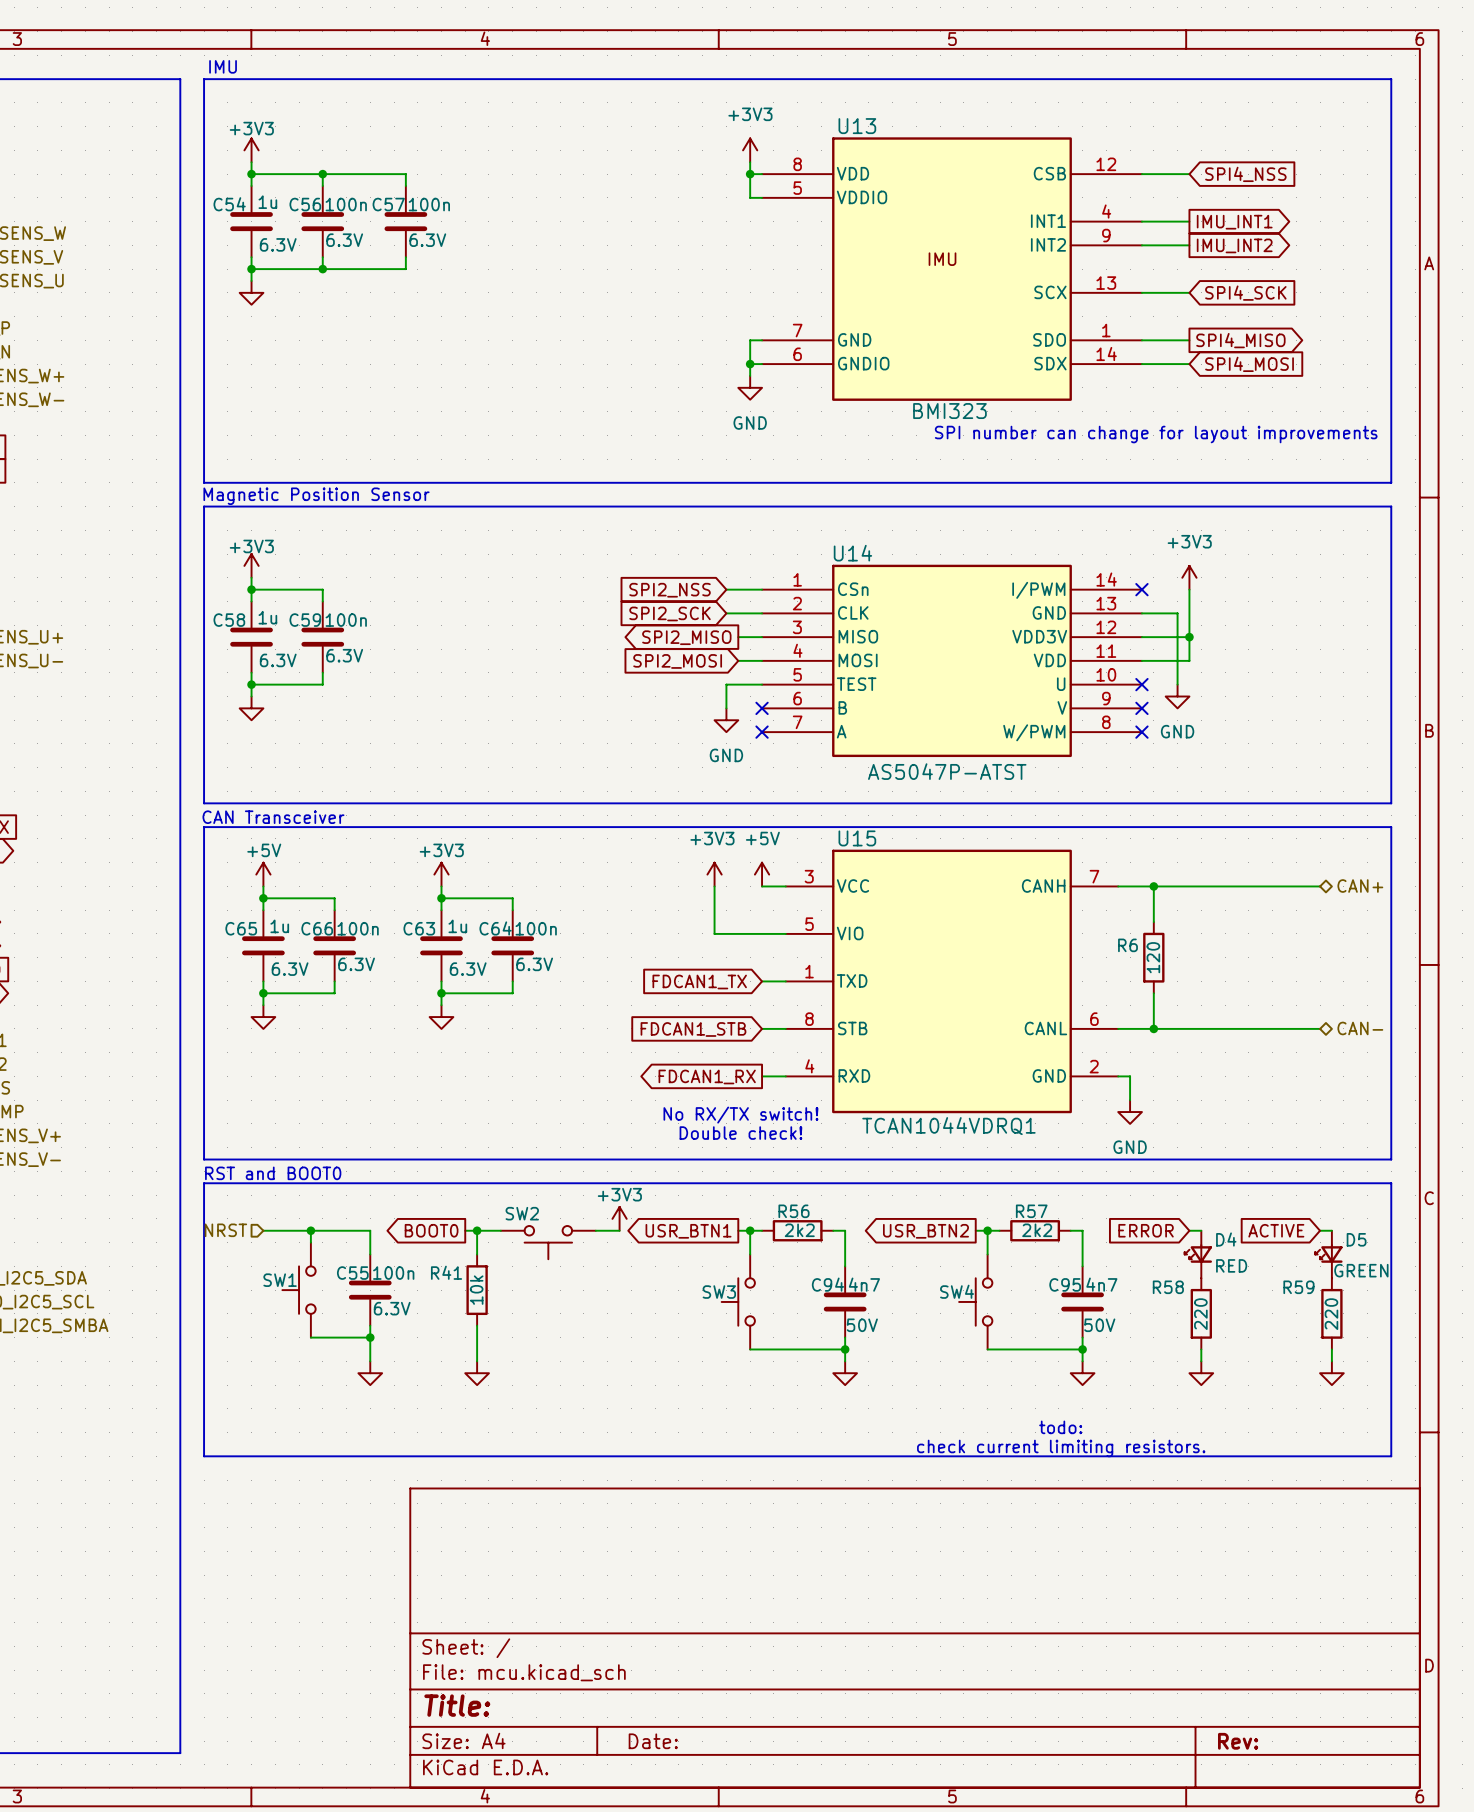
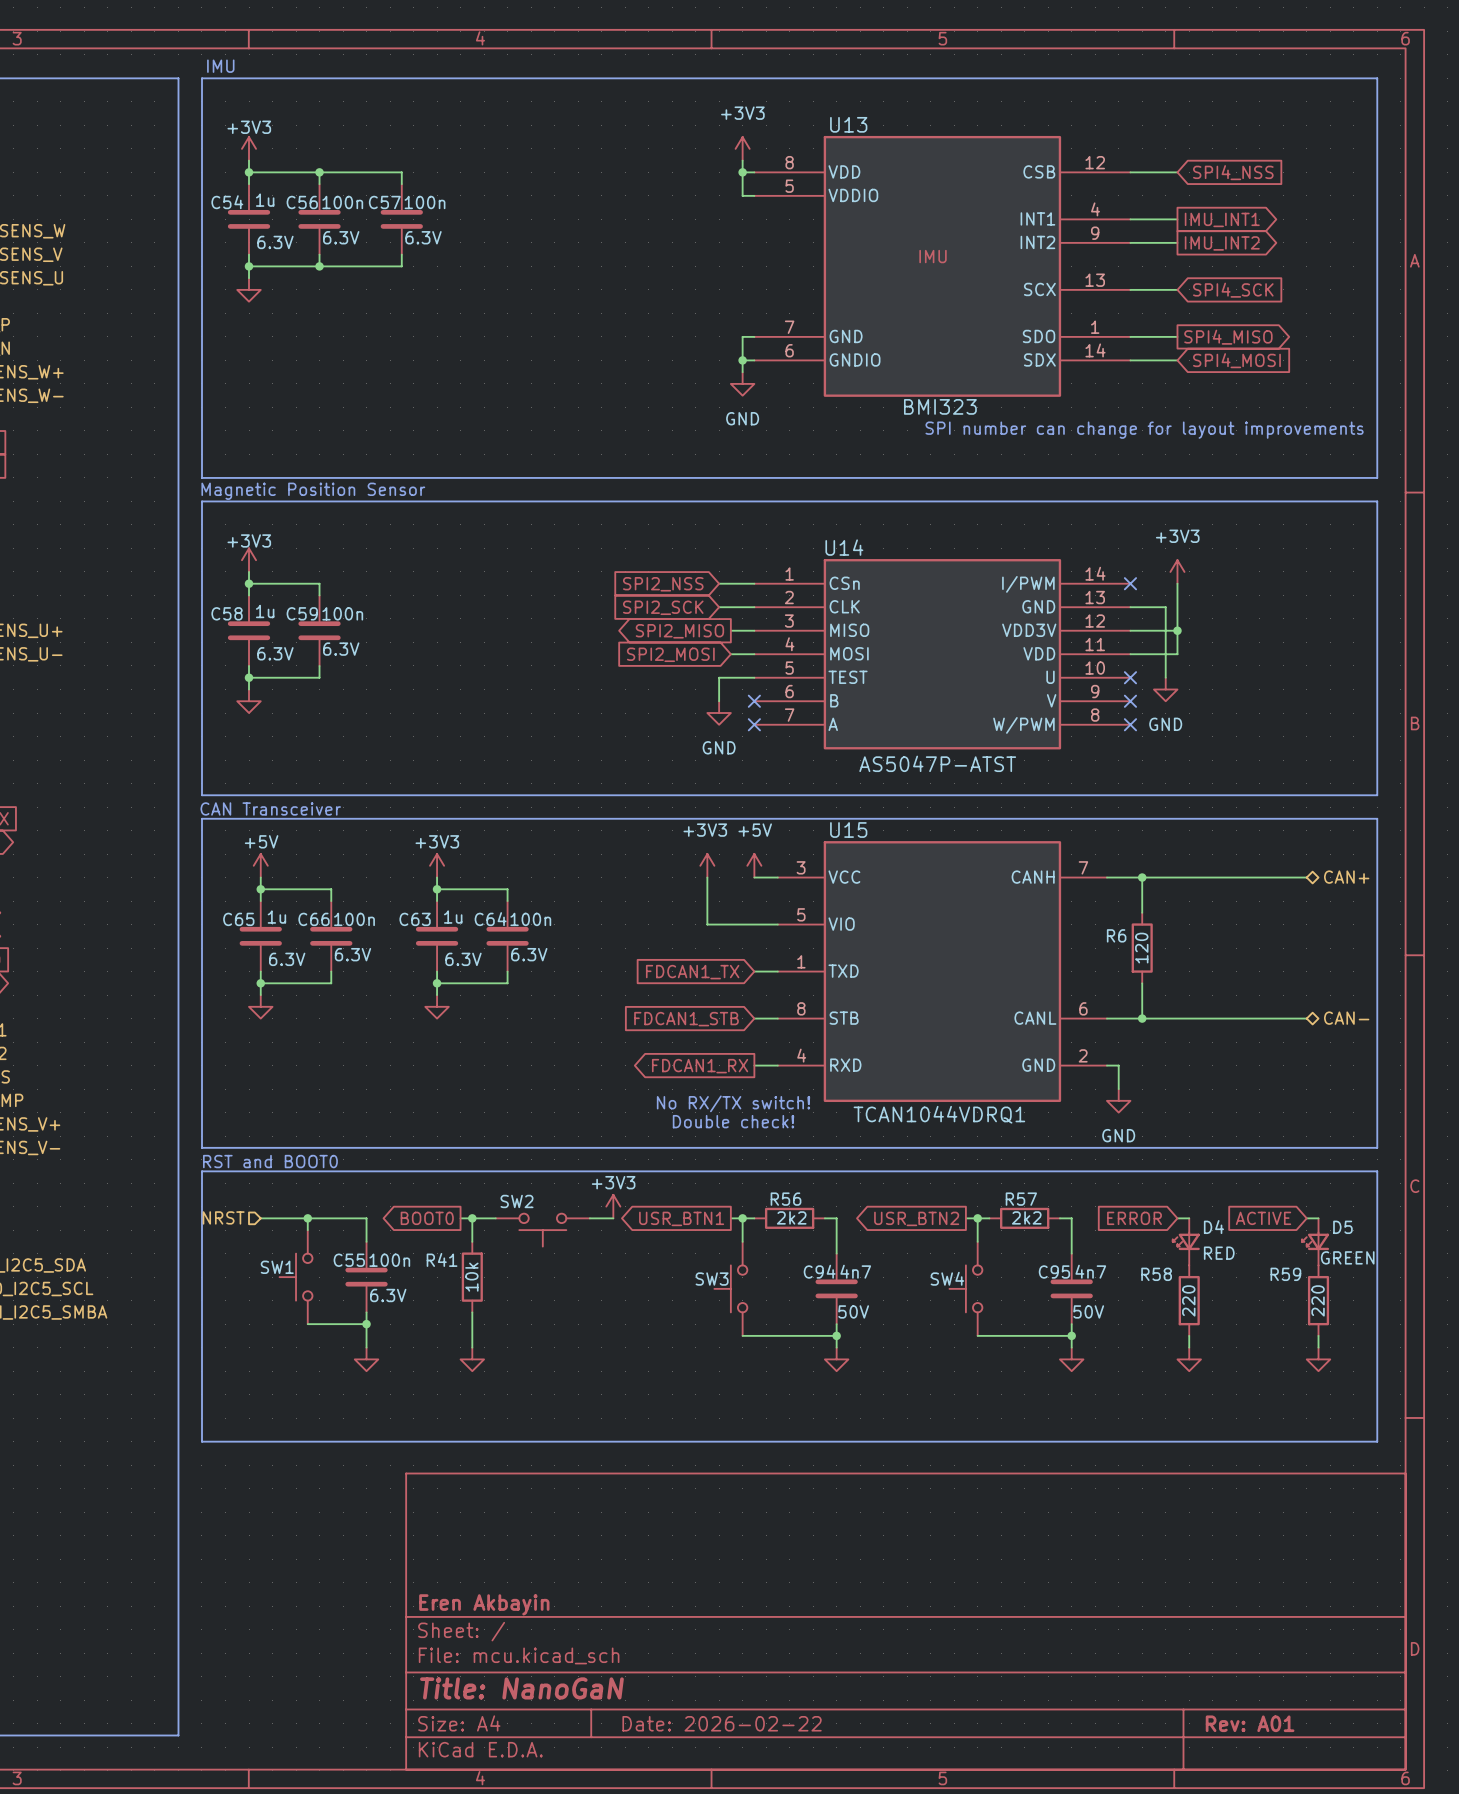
text: todo: (1060, 1427) -> none
text: check current limiting resistors. (1061, 1448) -> none
title block: none -> Eren Akbayin (484, 1604)
title block: Title: (457, 1705) -> Title: NanoGaN (521, 1688)
title block: Date: (653, 1741) -> Date: 2026-02-22 (722, 1723)
title block: Rev: (1238, 1741) -> Rev: A01 (1250, 1723)

